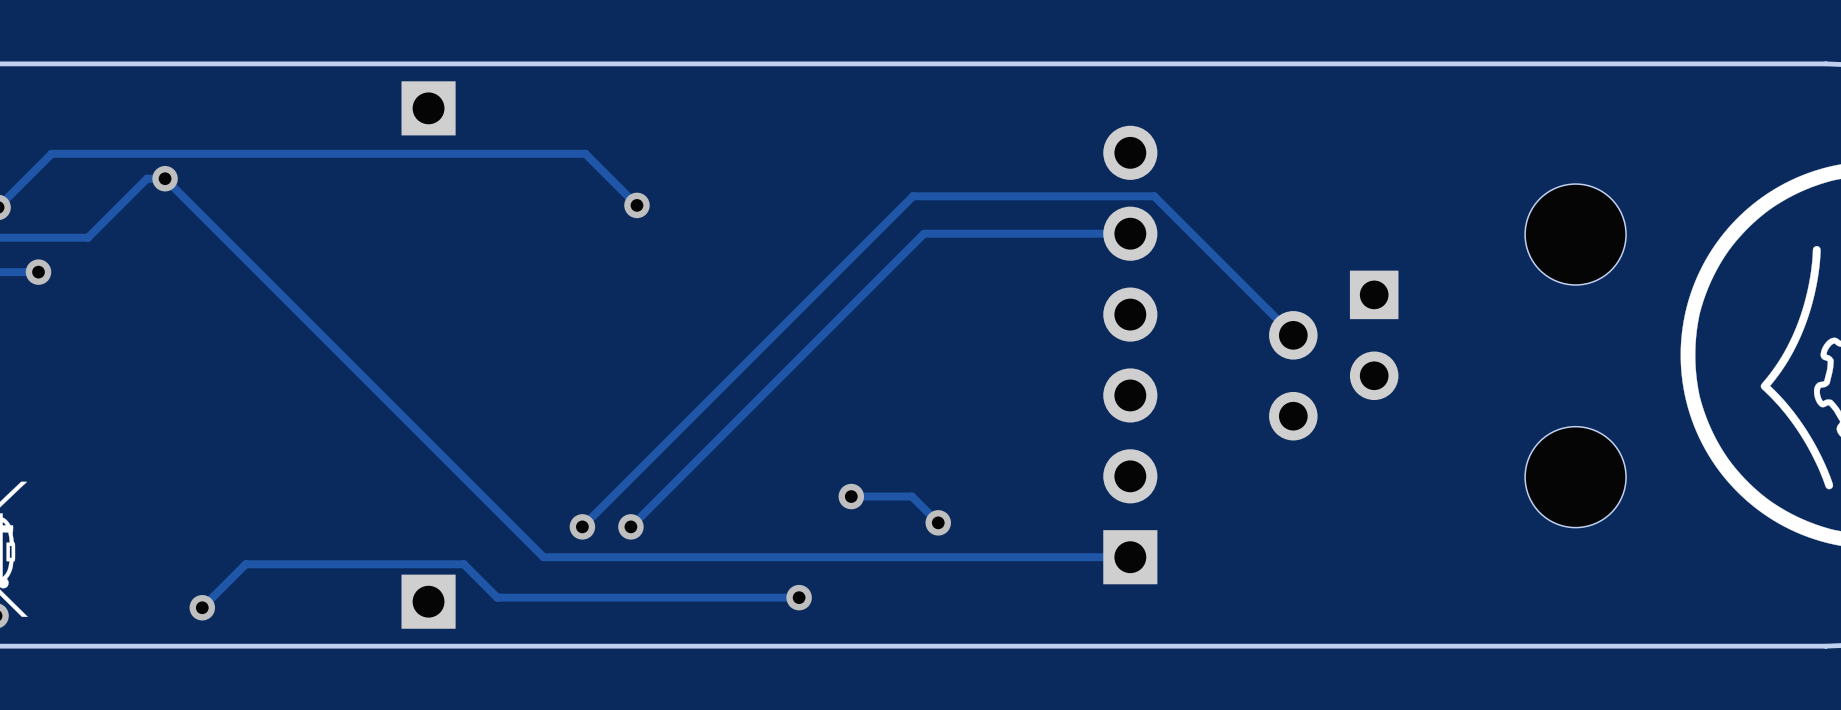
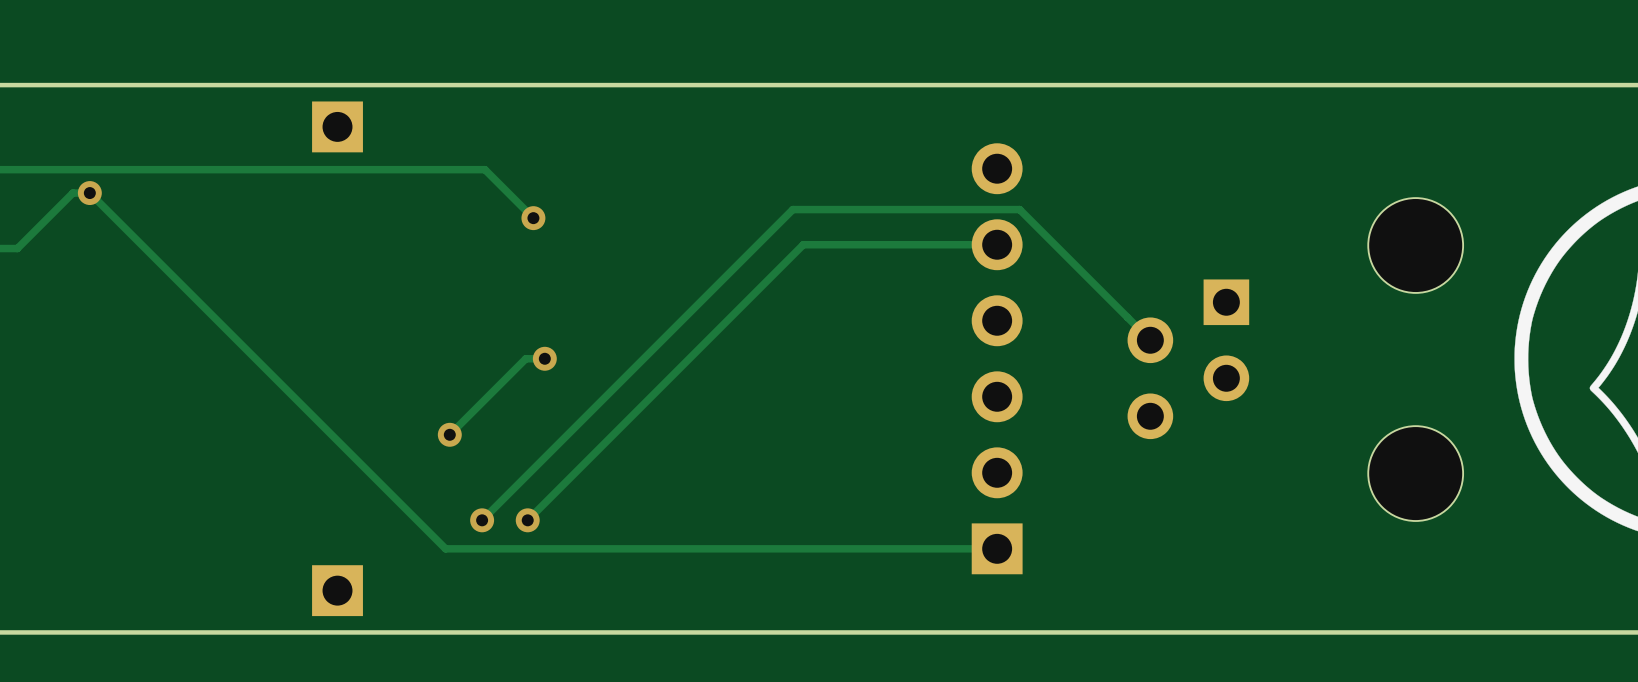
track: none -> (544, 358) (525, 358) (449, 434)
via: none -> (544, 358)
via: none -> (449, 434)
track: (851, 496) (911, 496) (938, 522) -> none
via: (851, 496) -> none
via: (938, 522) -> none
track: (799, 597) (497, 597) (463, 564) (245, 564) (202, 607) -> none
via: (799, 597) -> none
via: (202, 607) -> none

